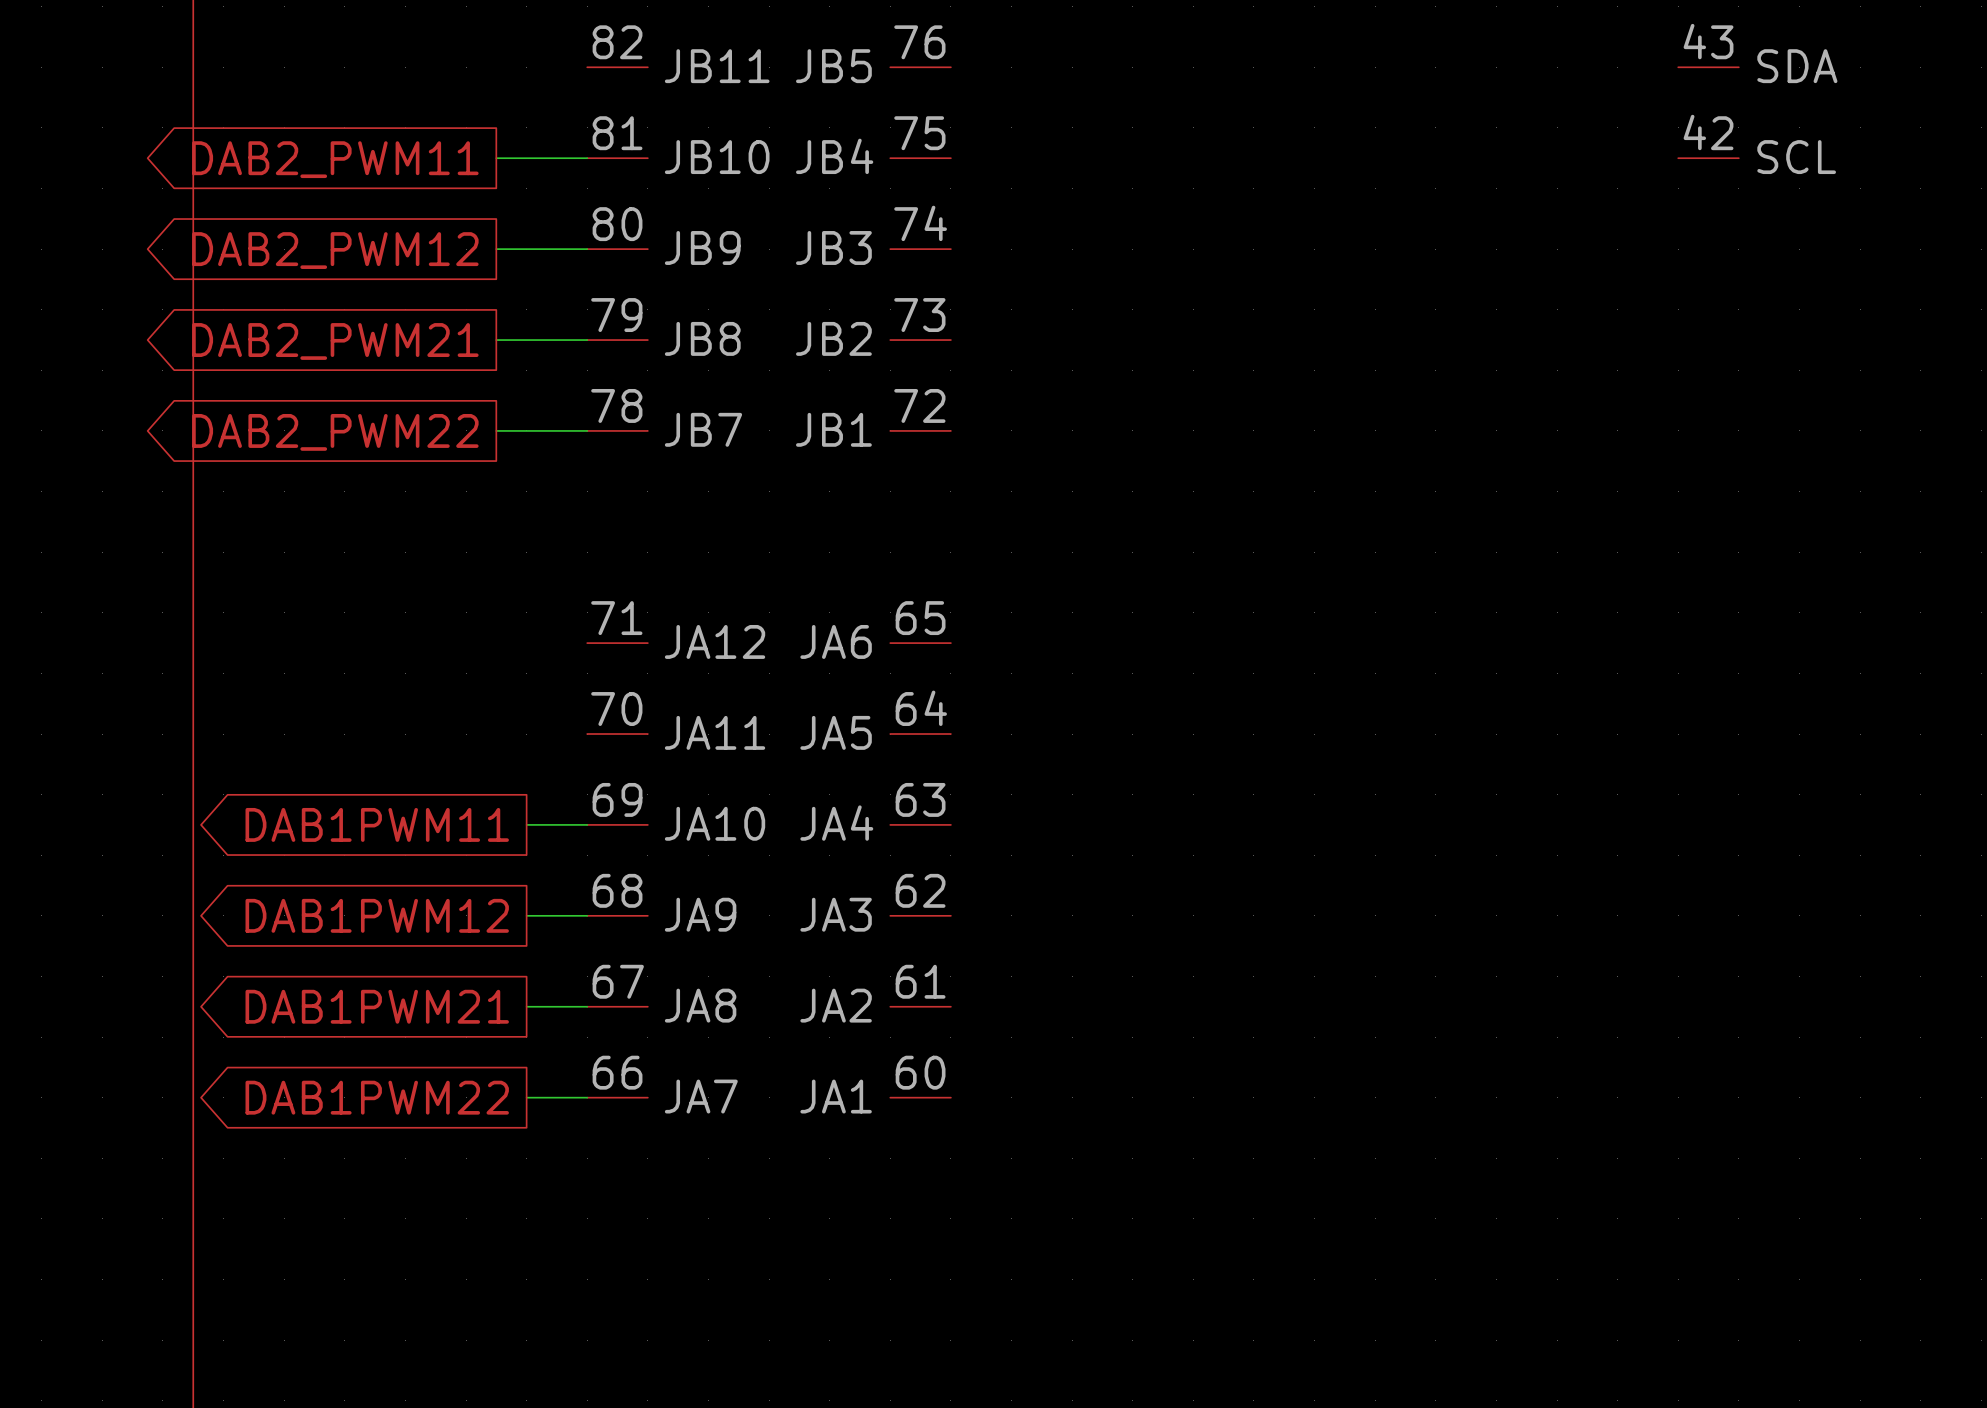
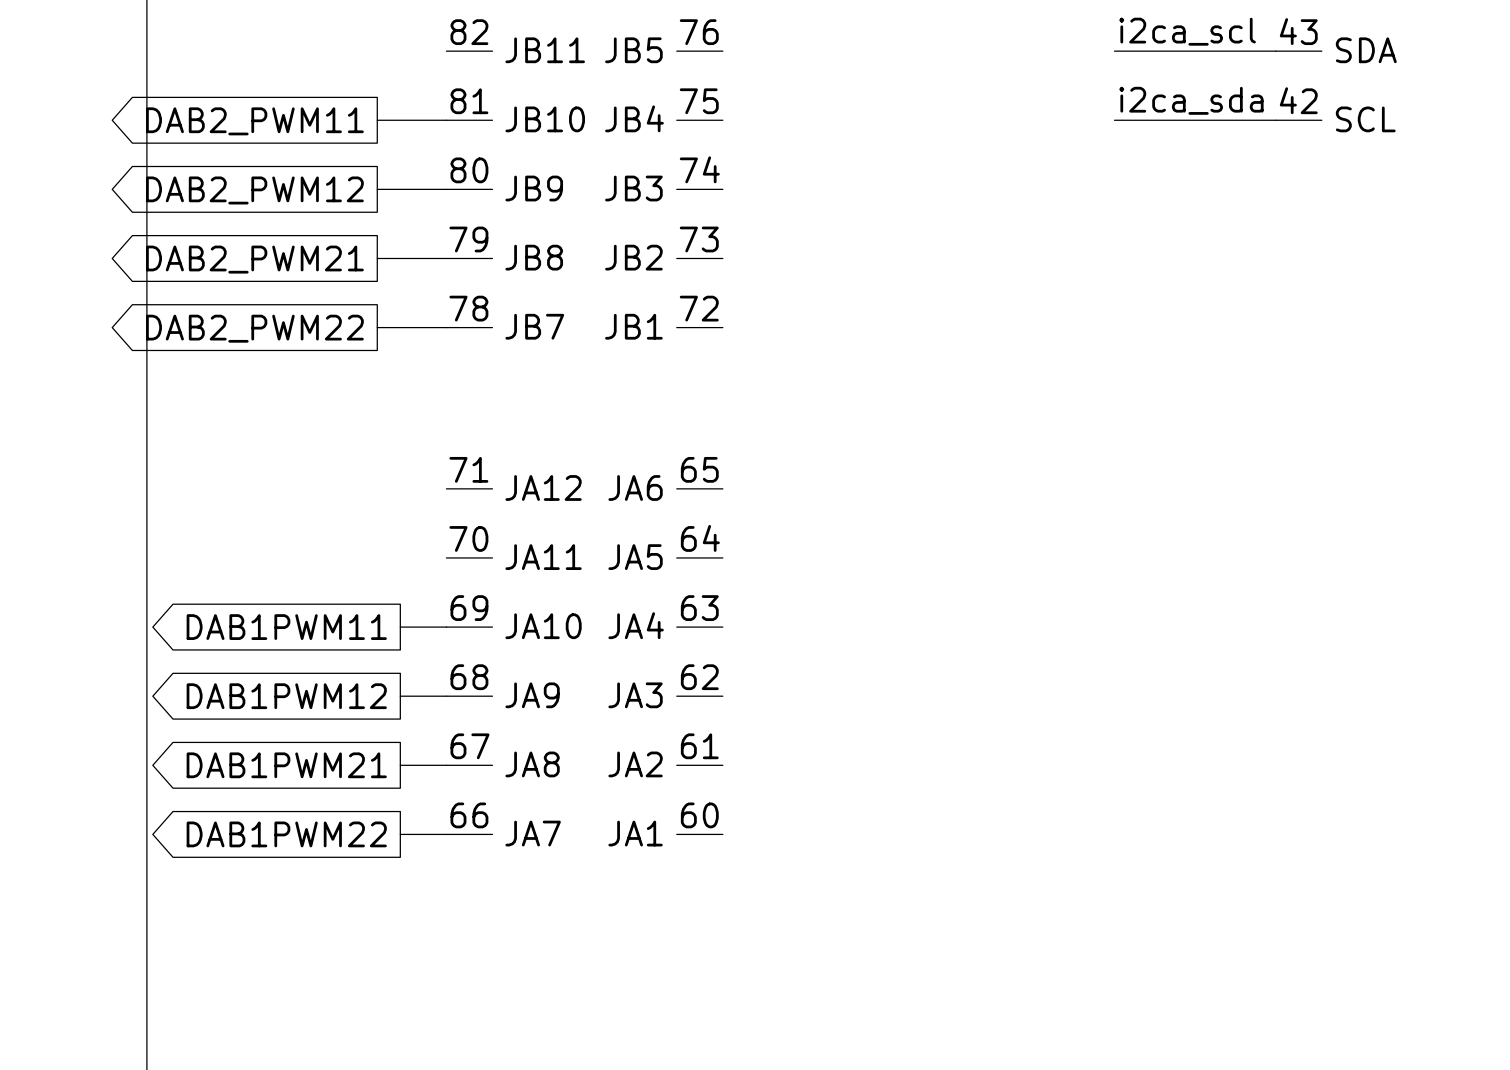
label: none -> i2ca_scl (1187, 31)
wire: none -> (1114, 51) (1275, 51)
label: none -> i2ca_sda (1191, 100)
wire: none -> (1114, 120) (1275, 120)

